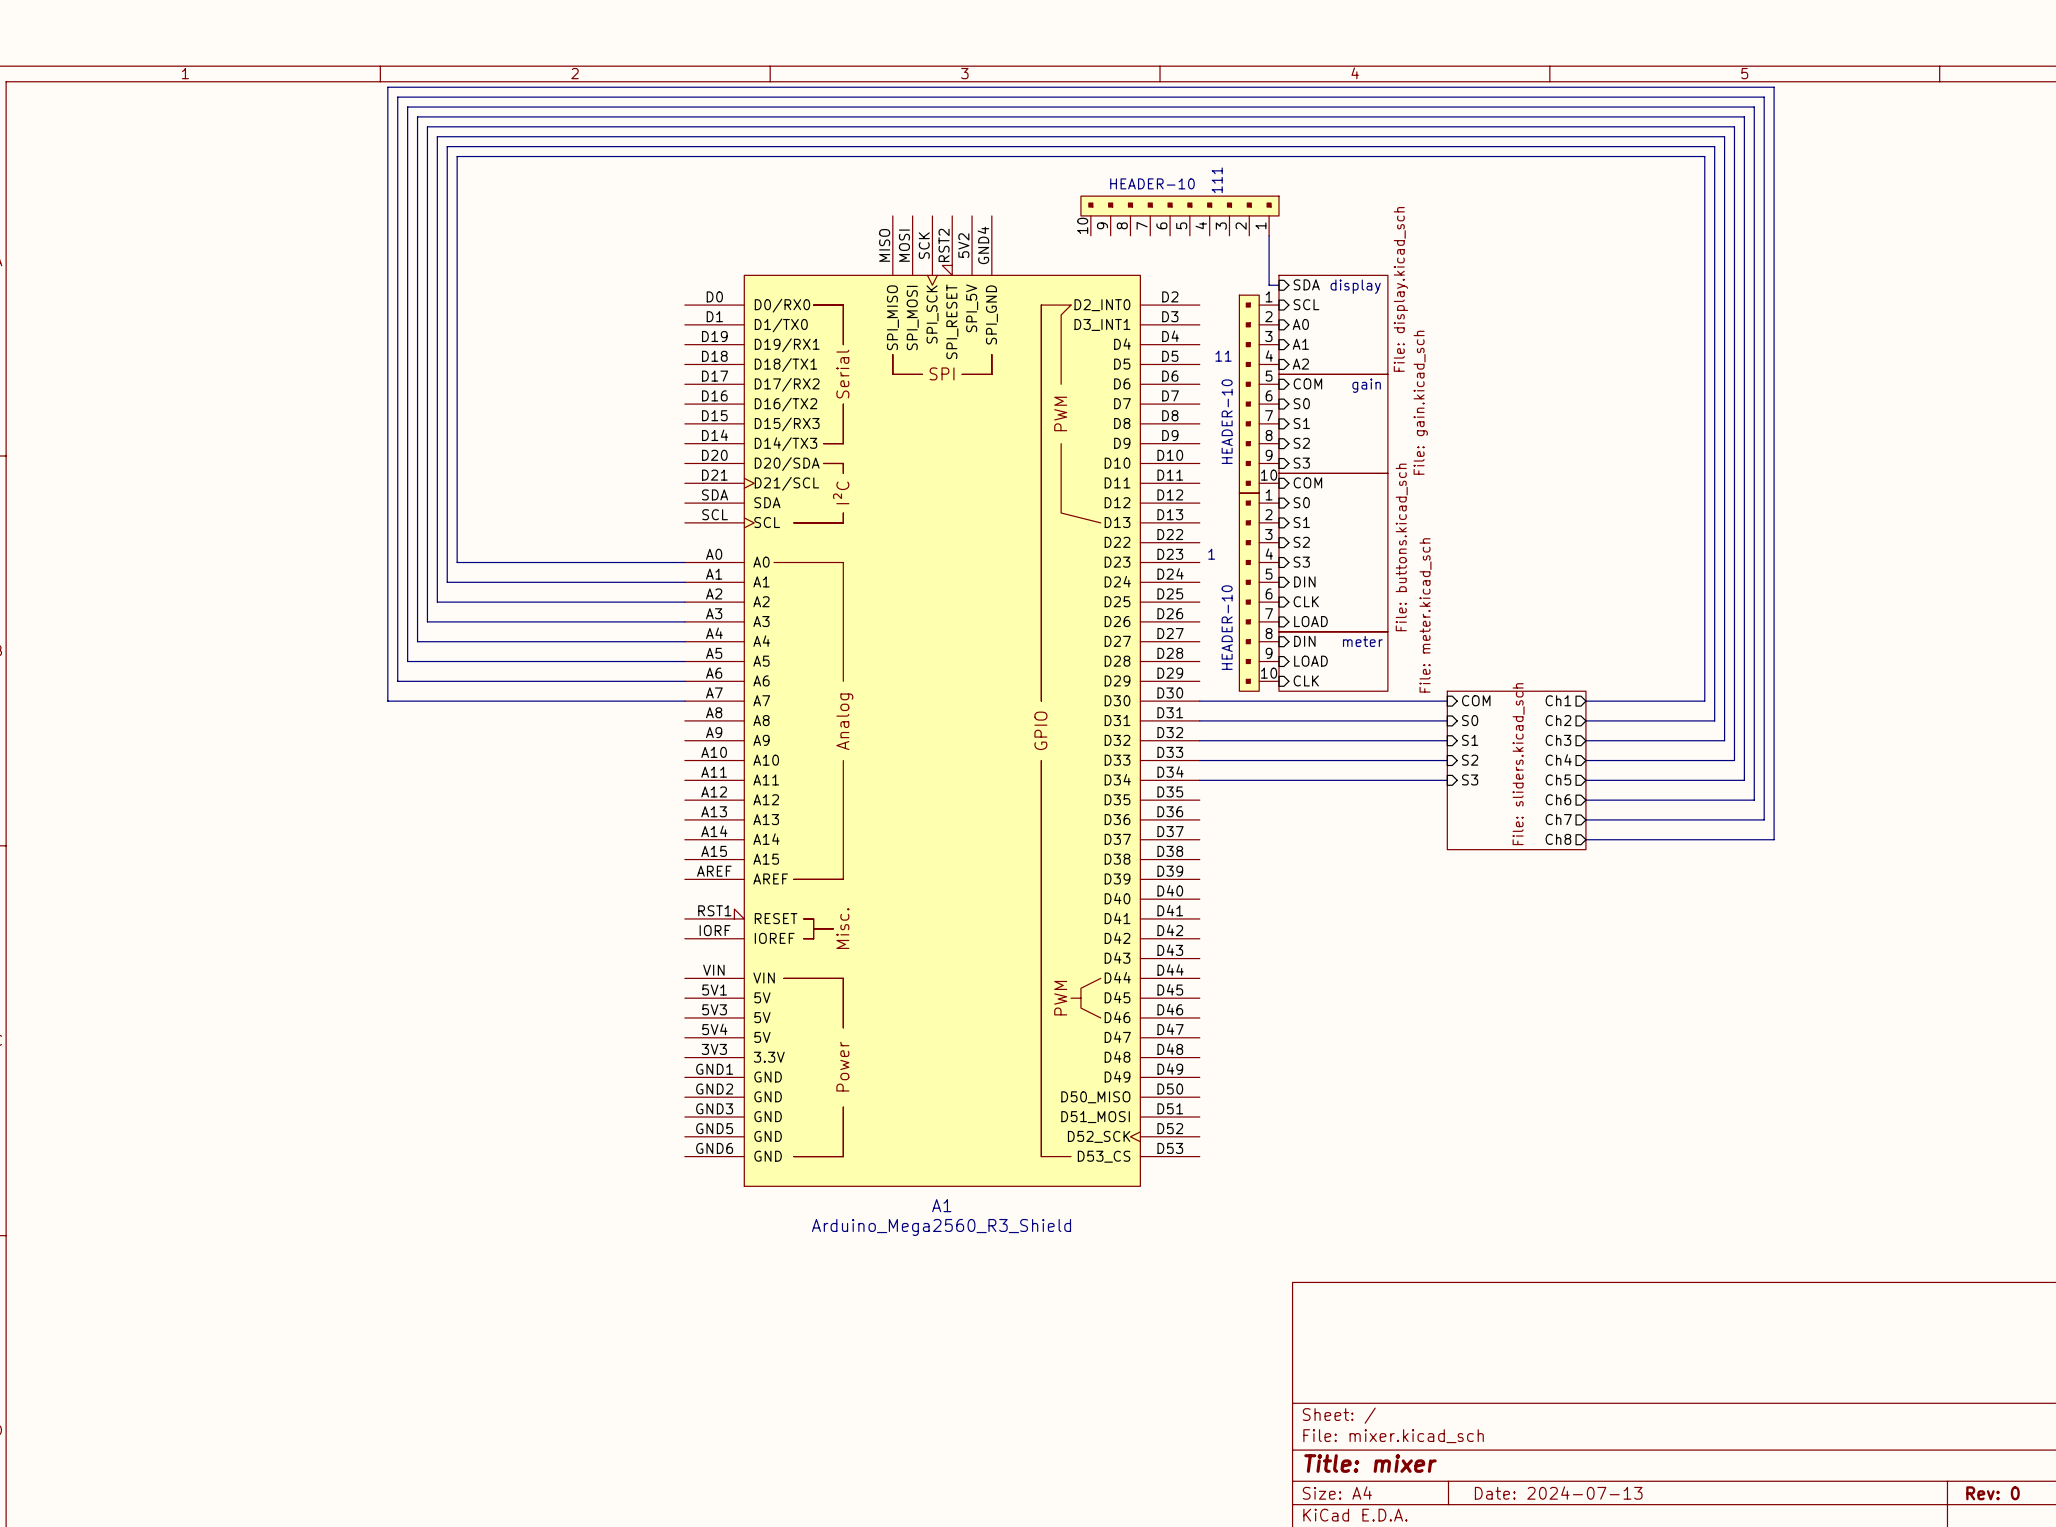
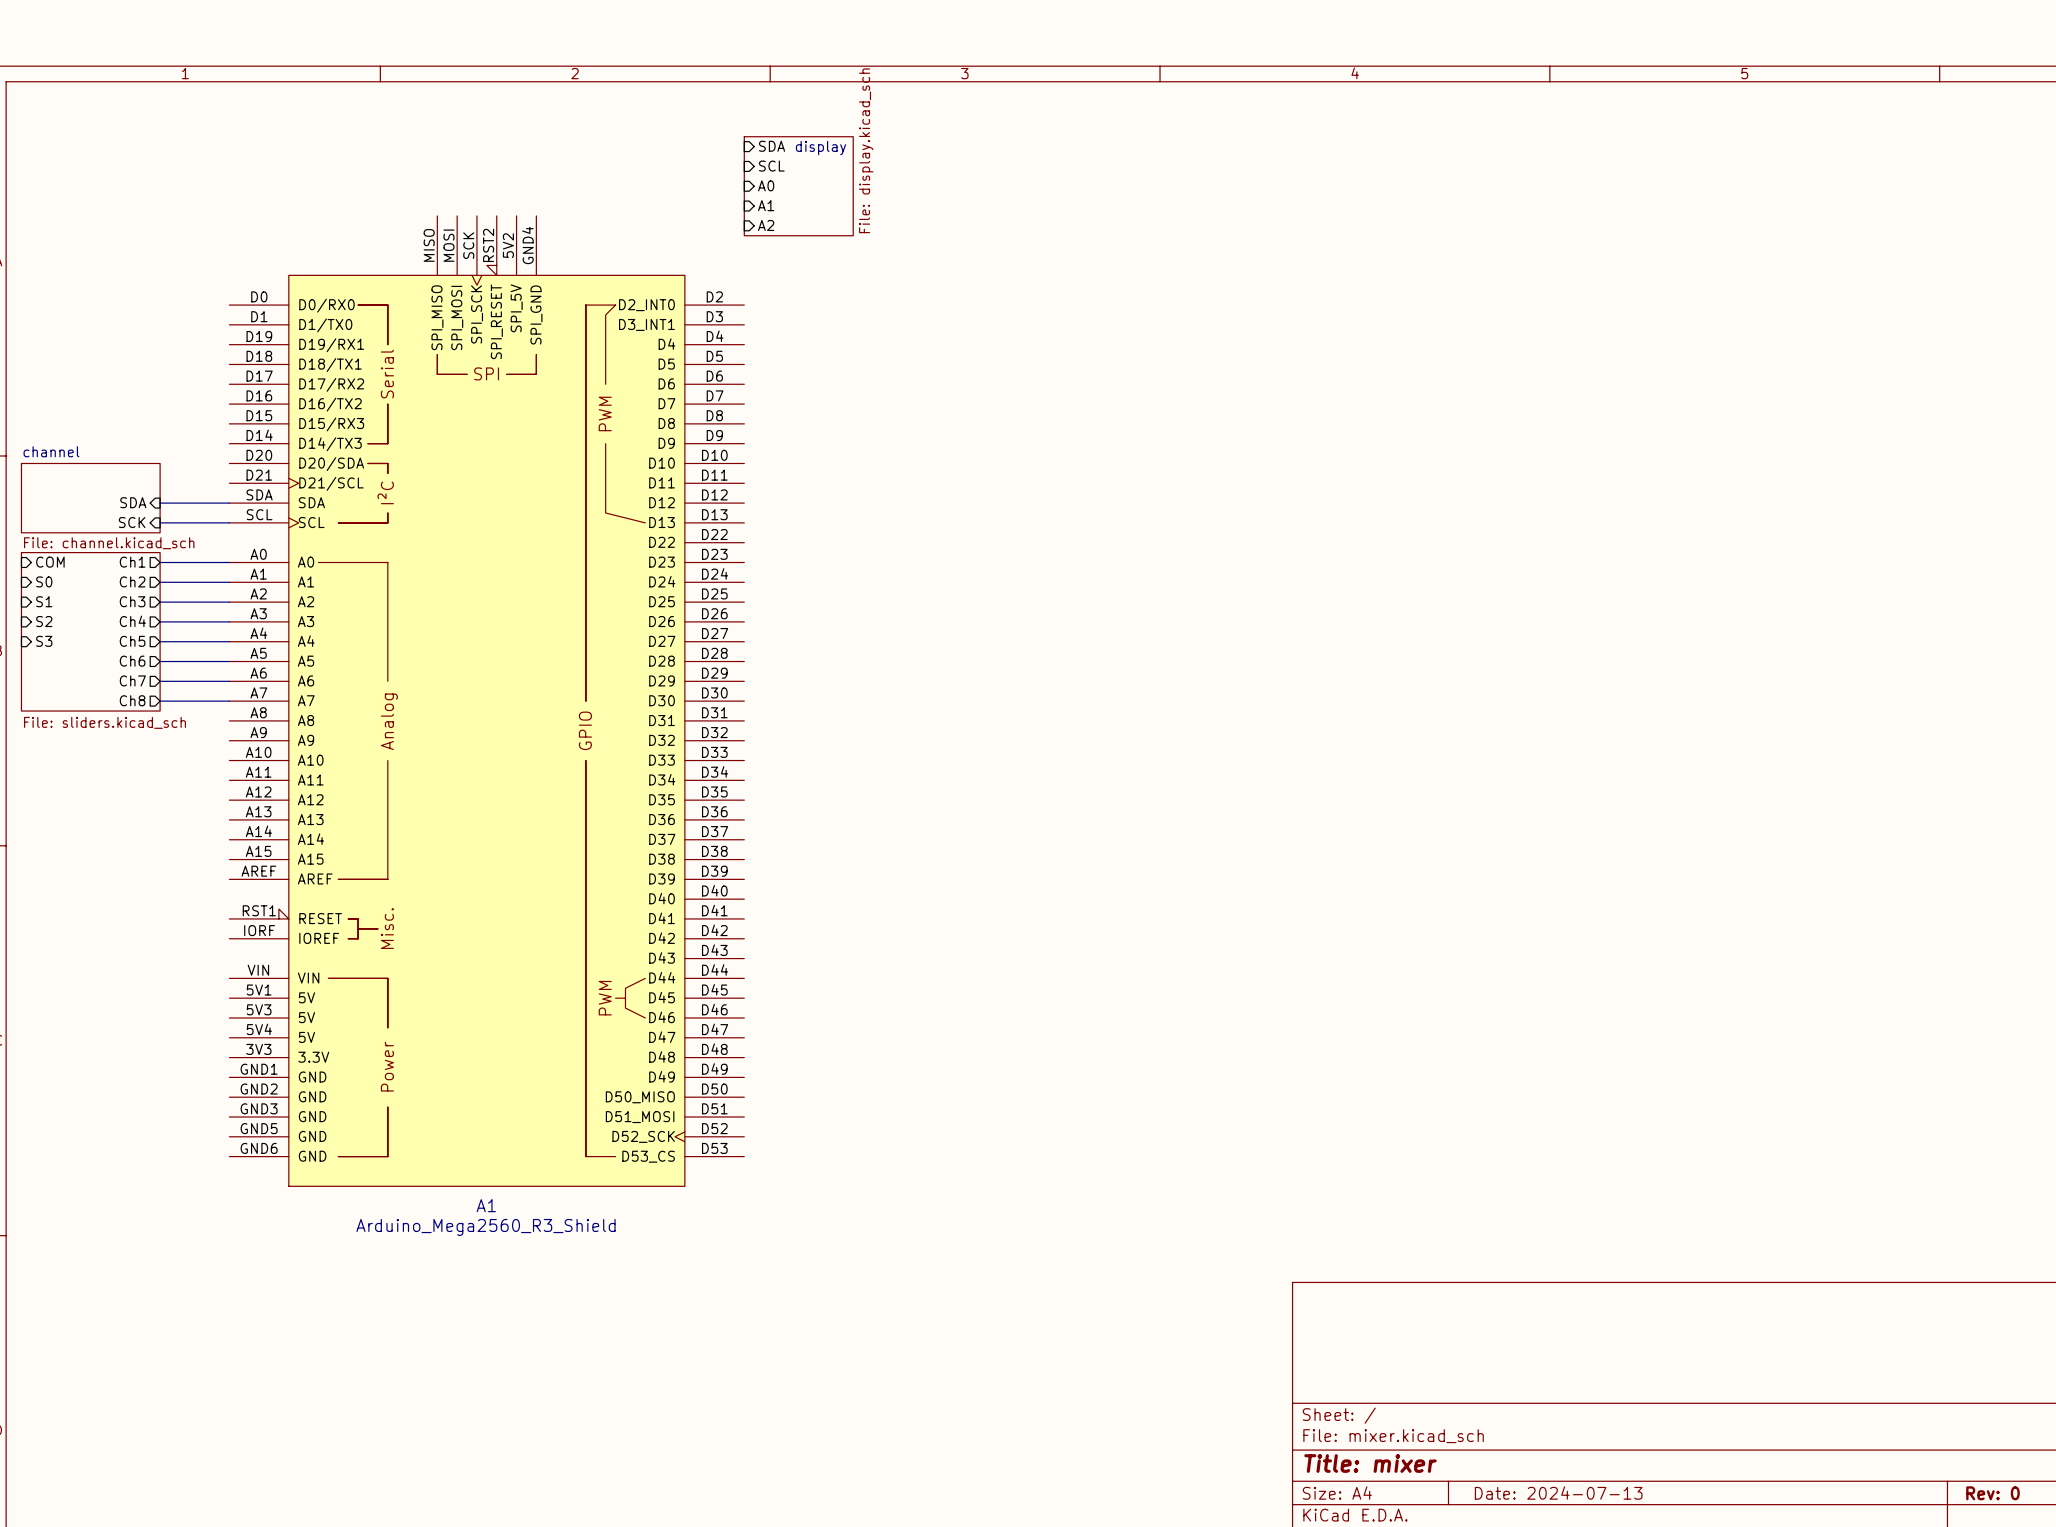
sheet pin: none -> SDA (772, 146)
sheet pin: none -> SCL (771, 166)
sheet pin: none -> A0 (766, 185)
sheet display: none -> File: display.kicad_sch (798, 186)
sheet pin: none -> A1 (766, 205)
111: HEADER-10 (1179, 215) -> none
sheet pin: none -> A2 (766, 225)
wire: (1269, 235) (1269, 285) (1278, 285) -> none
sheet pin: SDA (1306, 284) -> none
sheet pin: SCL (1306, 304) -> none
sheet pin: A0 (1300, 324) -> none
sheet display: File: display.kicad_sch (1333, 324) -> none
sheet pin: A1 (1300, 344) -> none
sheet pin: A2 (1300, 364) -> none
sheet pin: COM (1307, 383) -> none
11: HEADER-10 (1259, 394) -> none
sheet pin: S0 (1301, 403) -> none
sheet pin: S1 (1301, 423) -> none
sheet gain: File: gain.kicad_sch (1333, 423) -> none
sheet pin: S2 (1301, 443) -> none
sheet pin: S3 (1301, 463) -> none
sheet pin: COM (1307, 482) -> none
sheet channel: none -> File: channel.kicad_sch (90, 498)
sheet pin: none -> SDA (133, 502)
sheet pin: S0 (1301, 502) -> none
wire: none -> (160, 503) (229, 503)
sheet pin: none -> SCK (132, 522)
wire: none -> (160, 522) (229, 522)
sheet pin: S1 (1301, 522) -> none
sheet pin: S2 (1301, 542) -> none
sheet: File: buttons.kicad_sch (1333, 552) -> none
sheet pin: none -> COM (50, 562)
sheet pin: none -> Ch1 (132, 562)
wire: none -> (160, 562) (229, 562)
wire: (684, 562) (457, 562) (457, 156) (1704, 156) (1704, 701) (1585, 701) -> none
sheet pin: S3 (1301, 562) -> none
sheet pin: none -> S0 (44, 581)
sheet pin: none -> Ch2 (132, 581)
sheet pin: DIN (1304, 581) -> none
wire: none -> (160, 582) (229, 582)
wire: (684, 582) (447, 582) (447, 146) (1714, 146) (1714, 720) (1585, 720) -> none
1: HEADER-10 (1259, 592) -> none
sheet pin: none -> S1 (44, 601)
sheet pin: none -> Ch3 (132, 601)
sheet pin: CLK (1306, 601) -> none
wire: none -> (160, 602) (229, 602)
wire: (684, 602) (437, 602) (437, 136) (1724, 136) (1724, 740) (1585, 740) -> none
sheet pin: none -> S2 (44, 621)
sheet pin: none -> Ch4 (132, 621)
wire: none -> (160, 621) (229, 621)
wire: (684, 621) (427, 621) (427, 126) (1734, 126) (1734, 760) (1585, 760) -> none
sheet pin: LOAD (1310, 621) -> none
sheet: none -> File: sliders.kicad_sch (90, 631)
sheet pin: none -> S3 (44, 641)
sheet pin: none -> Ch5 (132, 641)
wire: none -> (160, 641) (229, 641)
wire: (684, 641) (417, 641) (417, 116) (1744, 116) (1744, 780) (1585, 780) -> none
sheet pin: DIN (1304, 641) -> none
sheet pin: none -> Ch6 (132, 661)
wire: none -> (160, 661) (229, 661)
wire: (684, 661) (407, 661) (407, 107) (1754, 107) (1754, 800) (1585, 800) -> none
sheet pin: LOAD (1310, 661) -> none
sheet meter: File: meter.kicad_sch (1333, 661) -> none
sheet pin: none -> Ch7 (132, 680)
sheet pin: CLK (1306, 680) -> none
wire: none -> (160, 681) (229, 681)
wire: (684, 681) (397, 681) (397, 97) (1764, 97) (1764, 819) (1585, 819) -> none
sheet pin: none -> Ch8 (132, 700)
sheet pin: COM (1476, 700) -> none
sheet pin: Ch1 (1558, 700) -> none
wire: none -> (160, 701) (229, 701)
wire: (684, 701) (387, 701) (387, 87) (1774, 87) (1774, 839) (1585, 839) -> none
A1 position: (942, 701) -> (486, 701)
wire: (1199, 701) (1447, 701) -> none
wire: (1199, 720) (1447, 720) -> none
sheet pin: S0 (1470, 720) -> none
sheet pin: Ch2 (1558, 720) -> none
wire: (1199, 740) (1447, 740) -> none
sheet pin: S1 (1470, 740) -> none
sheet pin: Ch3 (1558, 740) -> none
sheet pin: Ch4 (1558, 759) -> none
wire: (1199, 760) (1447, 760) -> none
sheet pin: S2 (1470, 760) -> none
sheet: File: sliders.kicad_sch (1516, 770) -> none
sheet pin: S3 (1470, 779) -> none
sheet pin: Ch5 (1558, 779) -> none
wire: (1199, 780) (1447, 780) -> none
sheet pin: Ch6 (1558, 799) -> none
sheet pin: Ch7 (1558, 819) -> none
sheet pin: Ch8 (1558, 839) -> none

